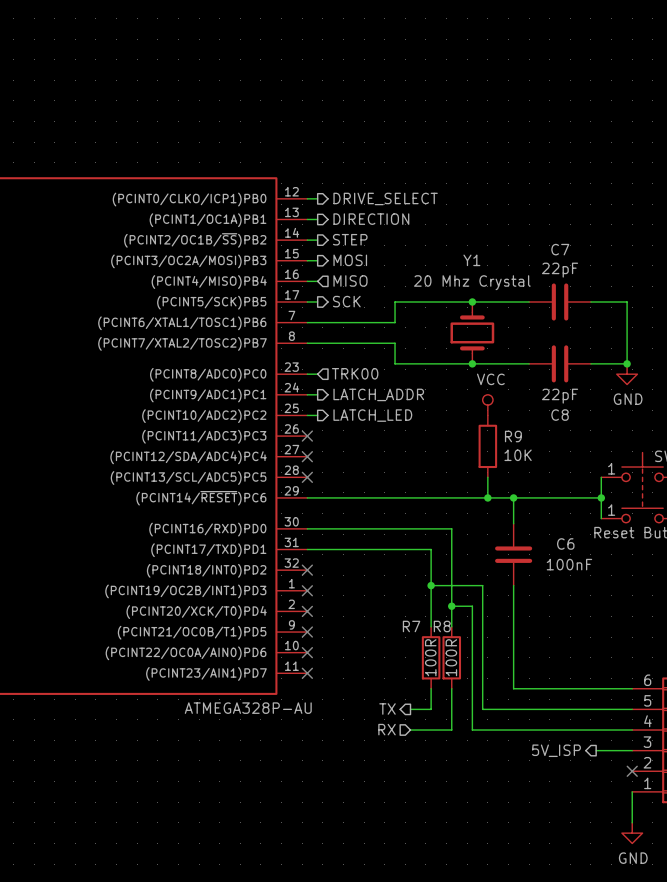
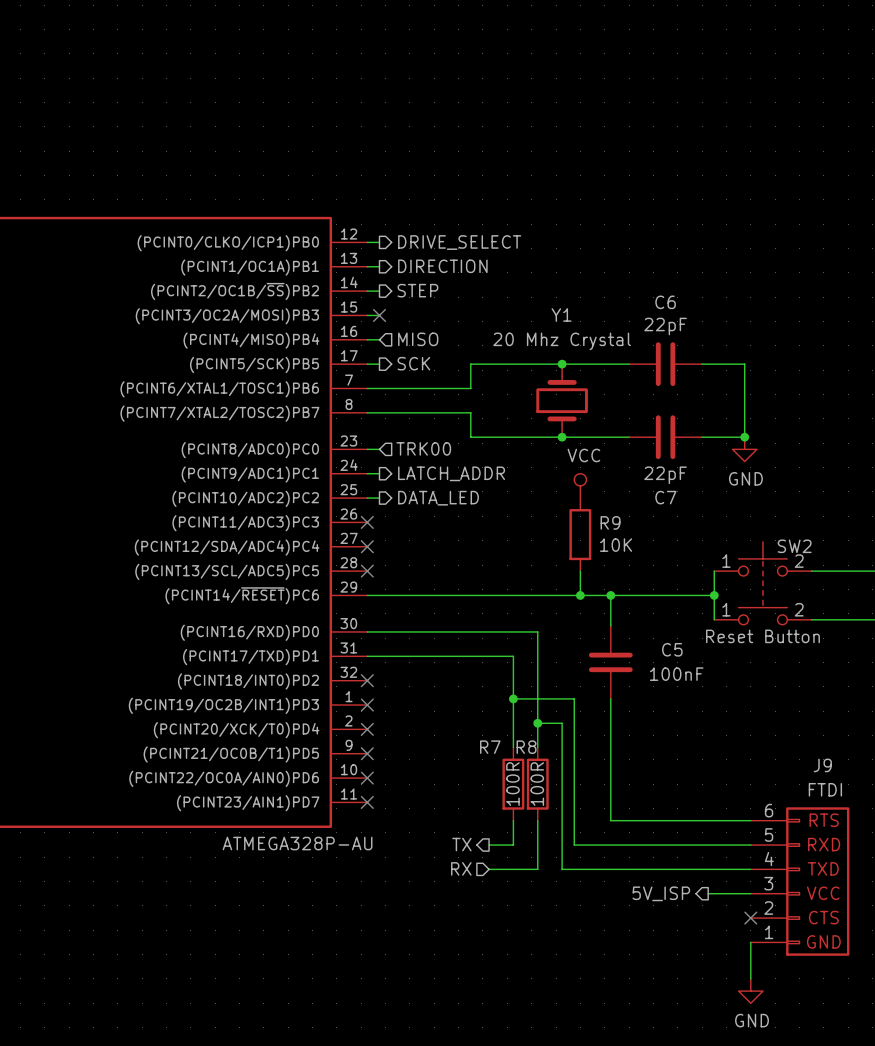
C7 name: C7 (560, 249) -> C6 (665, 302)
no-connect mark: none -> (379, 315)
hierarchical label: MOSI (350, 260) -> none
hierarchical label: LATCH_LED (372, 415) -> DATA_LED (438, 498)
C8 name: C8 (560, 415) -> C7 (665, 497)
C6 name: C6 (565, 543) -> C5 (672, 649)

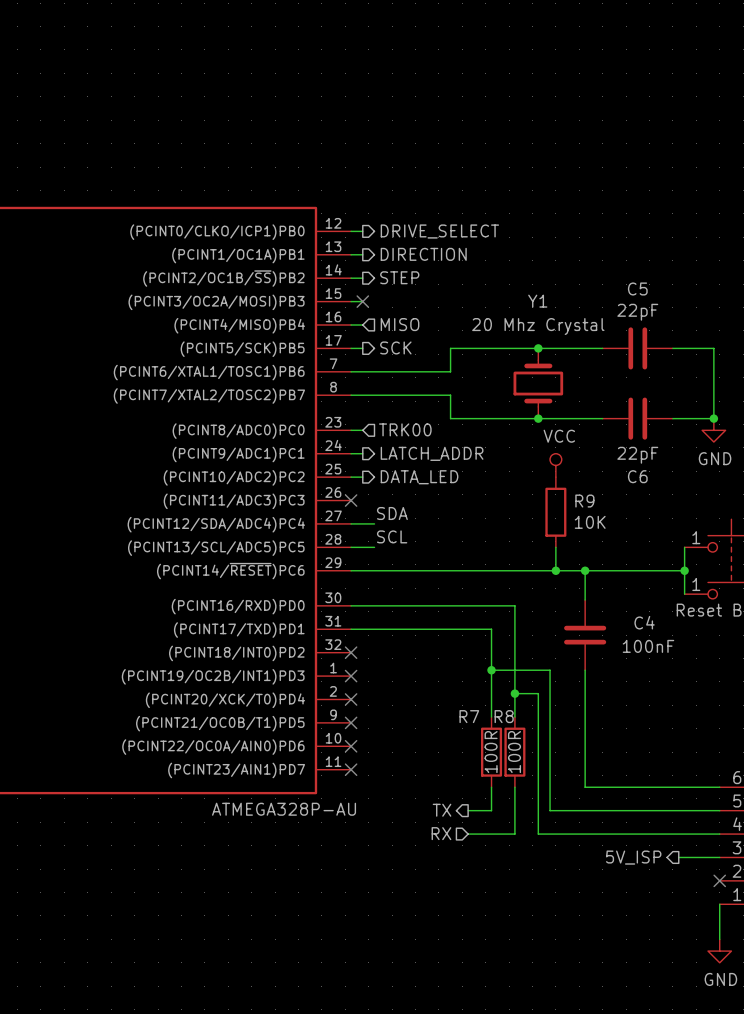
C6 name: C6 (665, 302) -> C5 (637, 288)
C7 name: C7 (665, 497) -> C6 (637, 476)
label: none -> SDA (392, 513)
wire: none -> (351, 523) (374, 523)
no-connect mark: (367, 546) -> none
label: none -> SCL (392, 536)
wire: none -> (351, 547) (374, 547)
no-connect mark: (367, 571) -> none
C5 name: C5 (672, 649) -> C4 (644, 622)

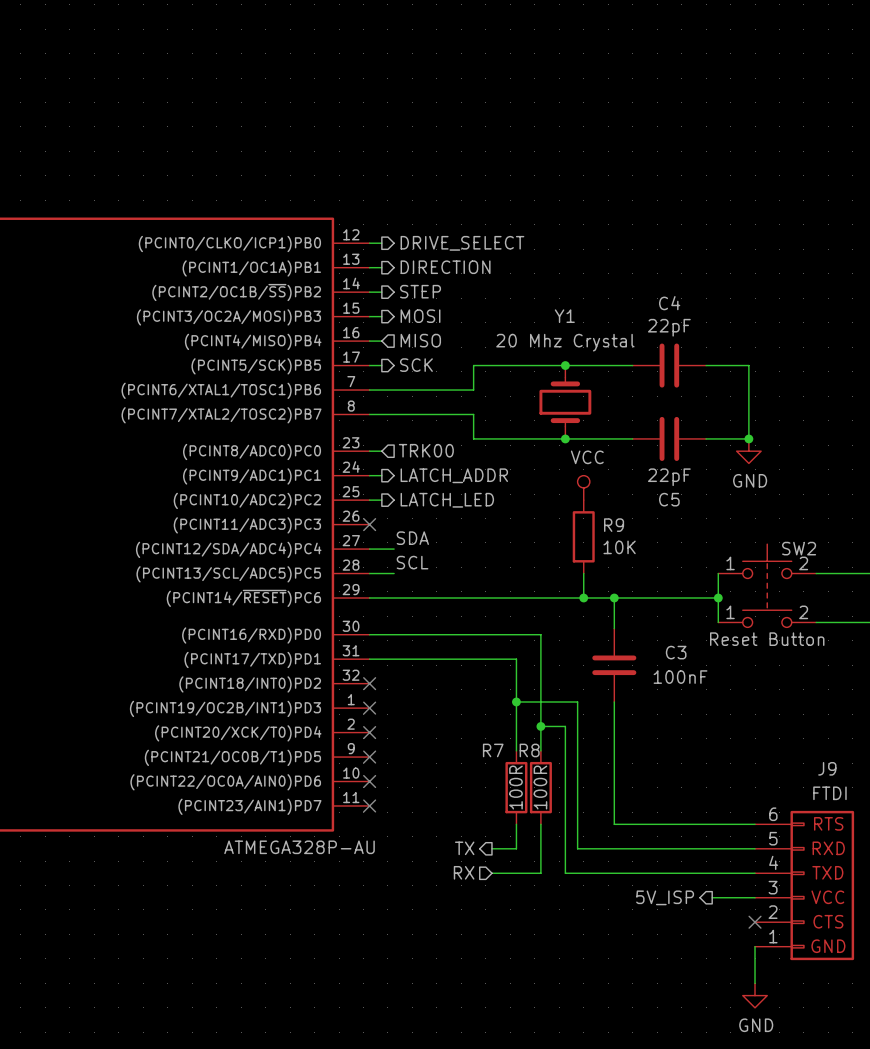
C5 name: C5 (637, 288) -> C4 (669, 303)
no-connect mark: (362, 301) -> none
hierarchical label: none -> MOSI (420, 316)
C6 name: C6 (637, 476) -> C5 (669, 499)
hierarchical label: DATA_LED (419, 477) -> LATCH_LED (447, 500)
C4 name: C4 (644, 622) -> C3 (676, 652)

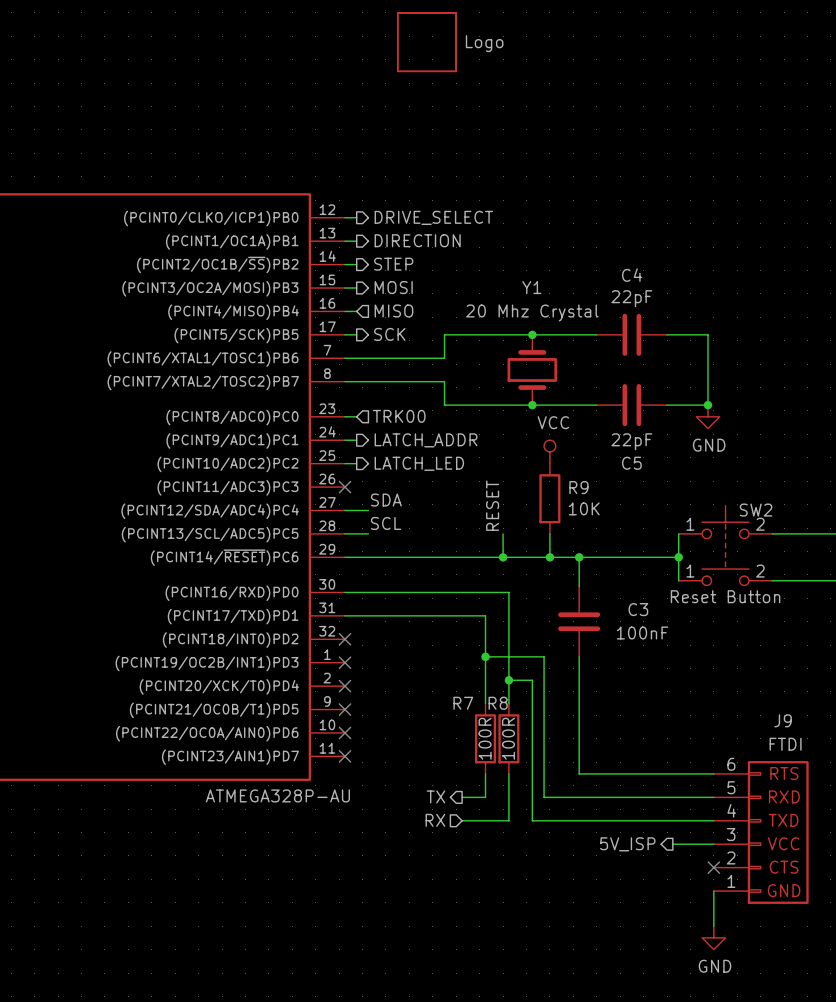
part: none -> Logo (426, 42)
label: none -> RESET (492, 505)
wire: none -> (503, 533) (503, 557)
junction: none -> (503, 557)

